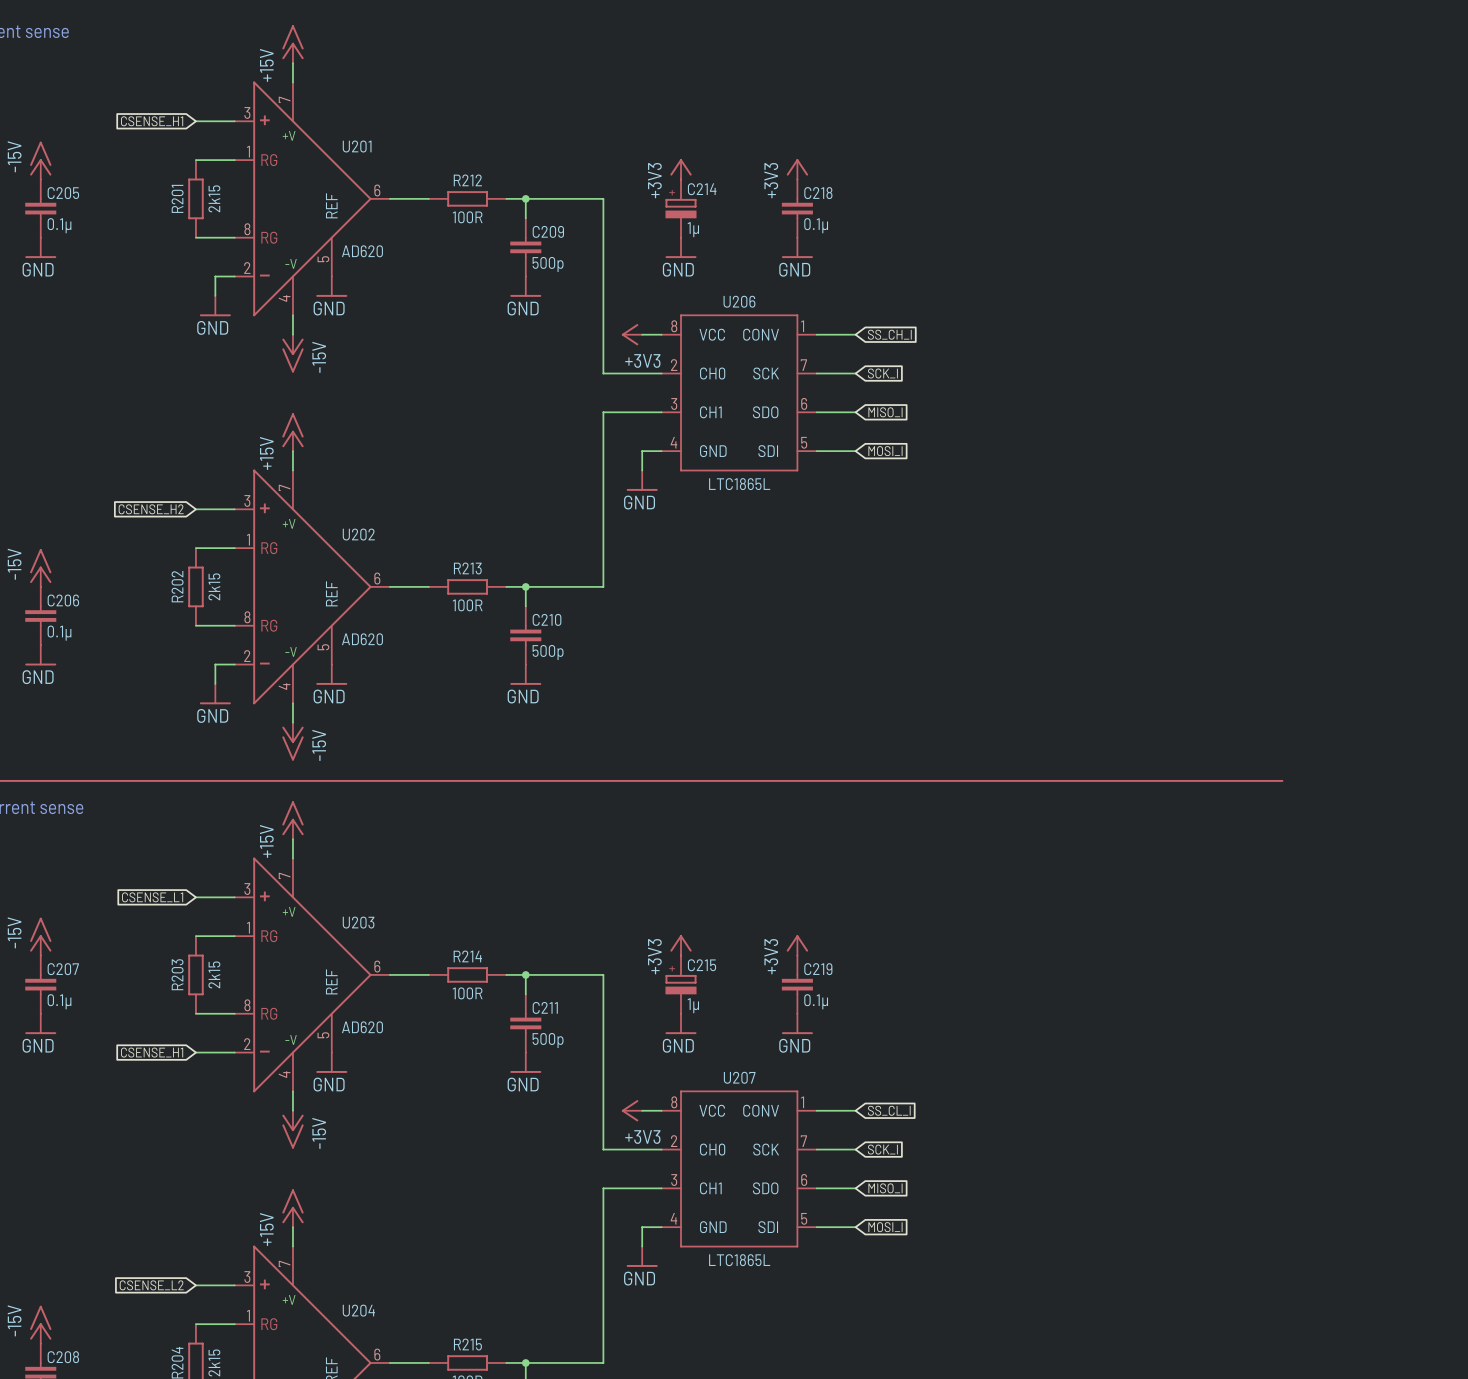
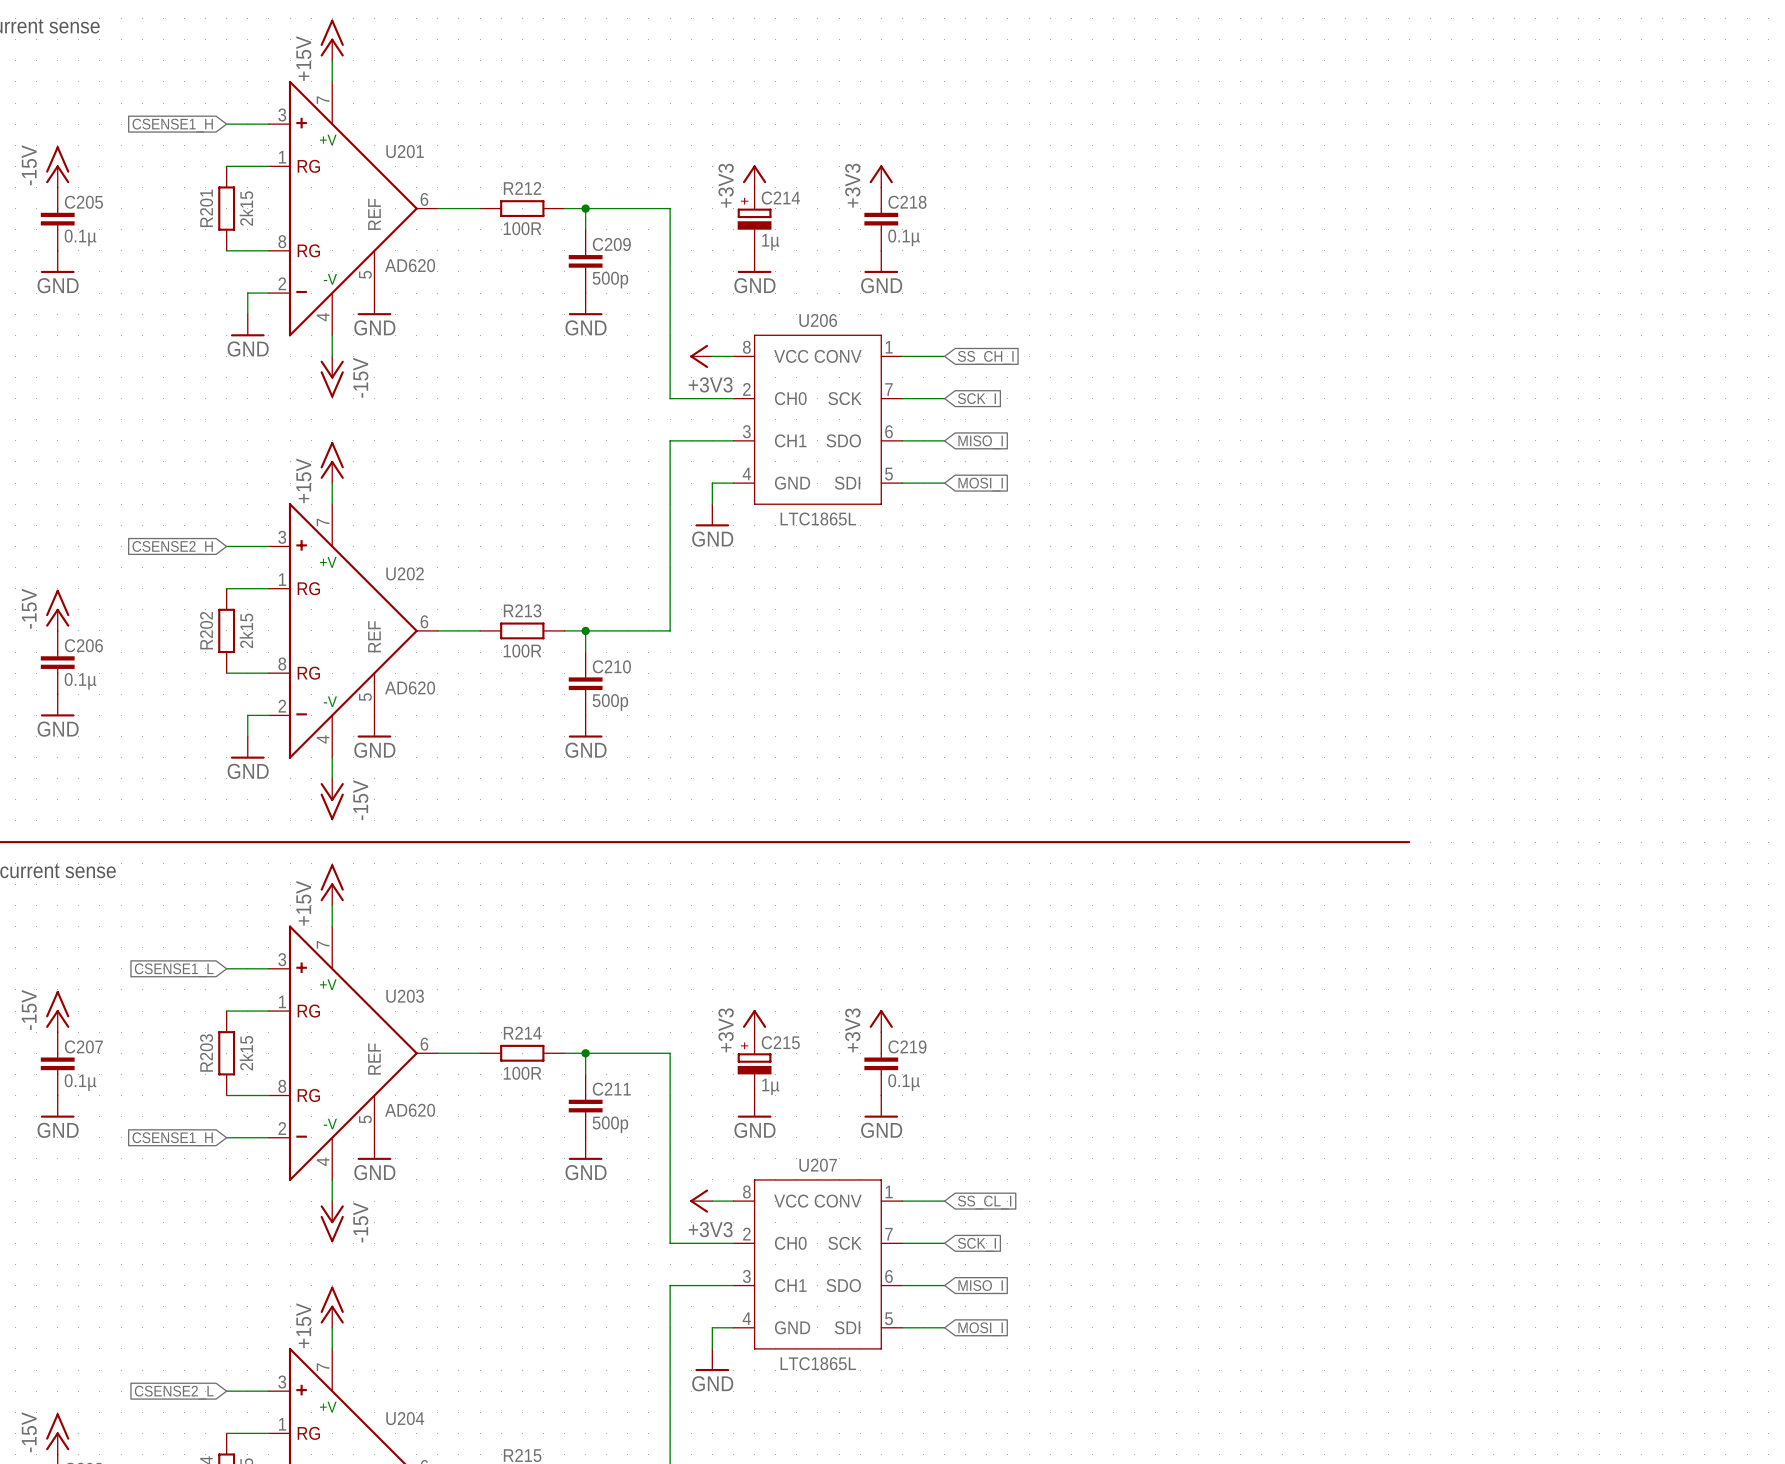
global label: CSENSE_H1 (152, 121) -> CSENSE1_H (172, 125)
global label: CSENSE_H2 (151, 509) -> CSENSE2_H (172, 547)
global label: CSENSE_L1 (152, 897) -> CSENSE1_L (174, 970)
global label: CSENSE_H1 (152, 1052) -> CSENSE1_H (172, 1139)
global label: CSENSE_L2 (151, 1285) -> CSENSE2_L (174, 1392)

